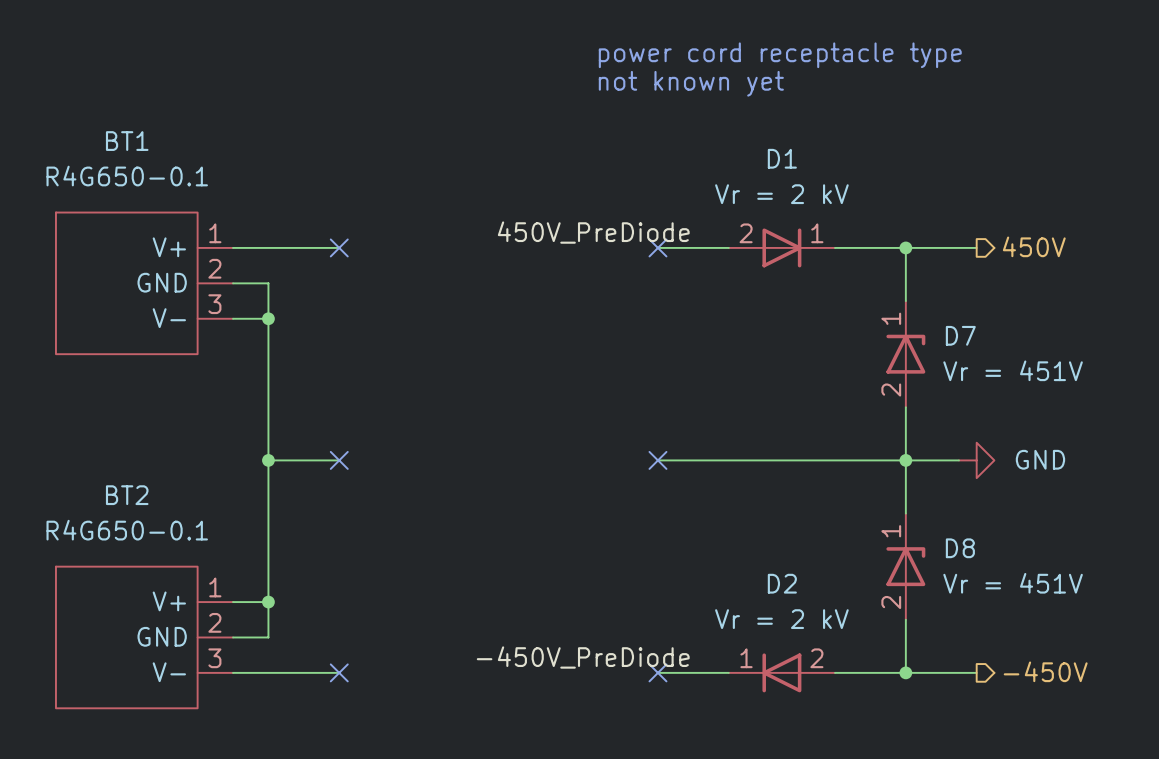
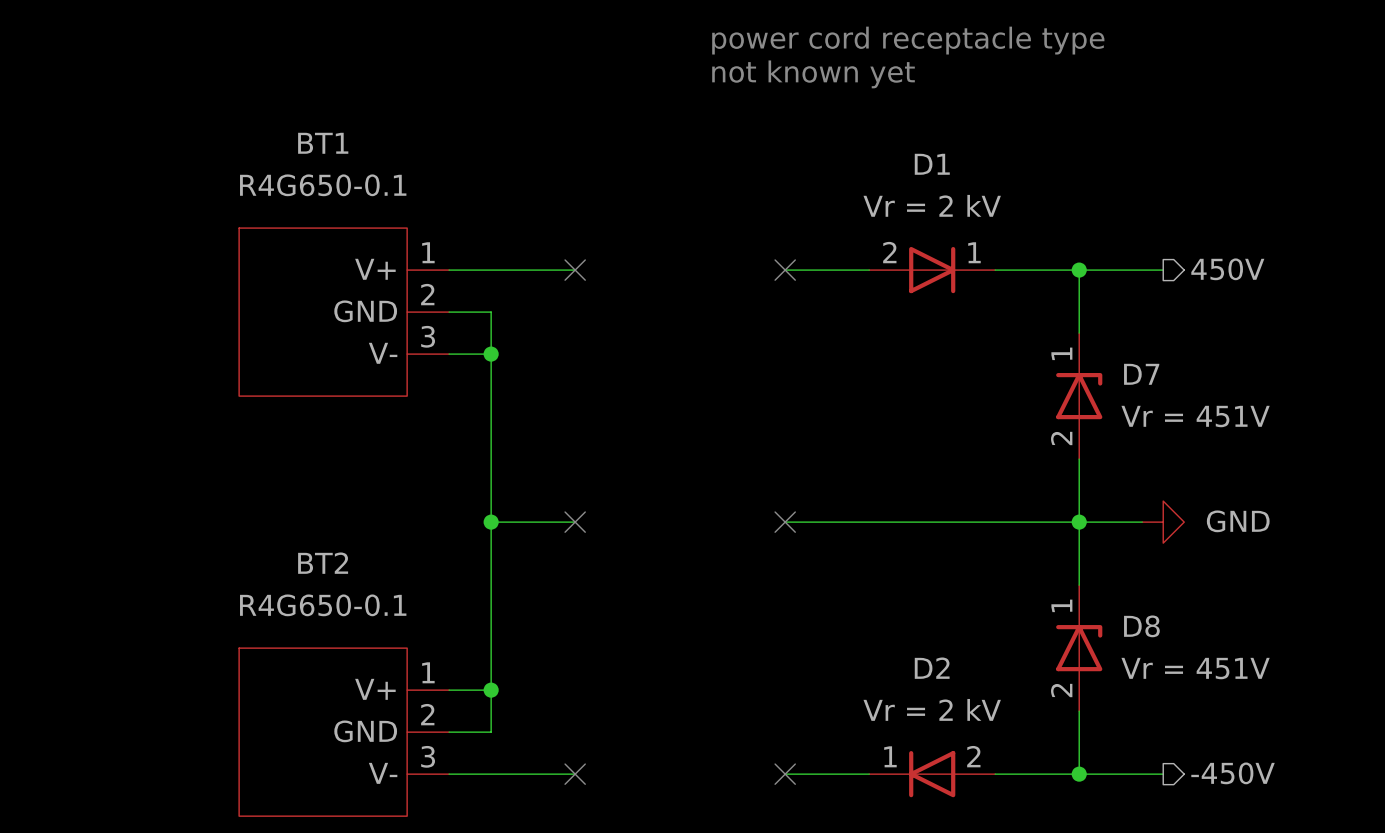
label: 450V_PreDiode (593, 232) -> none
wire: (233, 247) (339, 247) -> (449, 270) (575, 270)
no-connect mark: (339, 247) -> none
no-connect mark: none -> (575, 270)
BT1 position: (144, 283) -> (344, 312)
wire: (233, 283) (268, 283) (268, 637) (233, 637) -> (449, 312) (491, 312) (491, 732) (449, 732)
wire: (233, 318) (268, 318) -> (449, 354) (491, 354)
junction: (268, 318) -> none
junction: none -> (491, 354)
wire: (268, 460) (339, 460) -> (491, 522) (575, 522)
junction: (268, 460) -> none
no-connect mark: (339, 460) -> none
junction: none -> (491, 522)
no-connect mark: none -> (575, 522)
wire: (233, 602) (268, 602) -> (449, 690) (491, 690)
junction: (268, 602) -> none
junction: none -> (491, 690)
BT2 position: (144, 637) -> (344, 732)
label: -450V_PreDiode (583, 657) -> none
wire: (233, 672) (339, 672) -> (449, 774) (575, 774)
no-connect mark: (339, 672) -> none
no-connect mark: none -> (575, 774)

